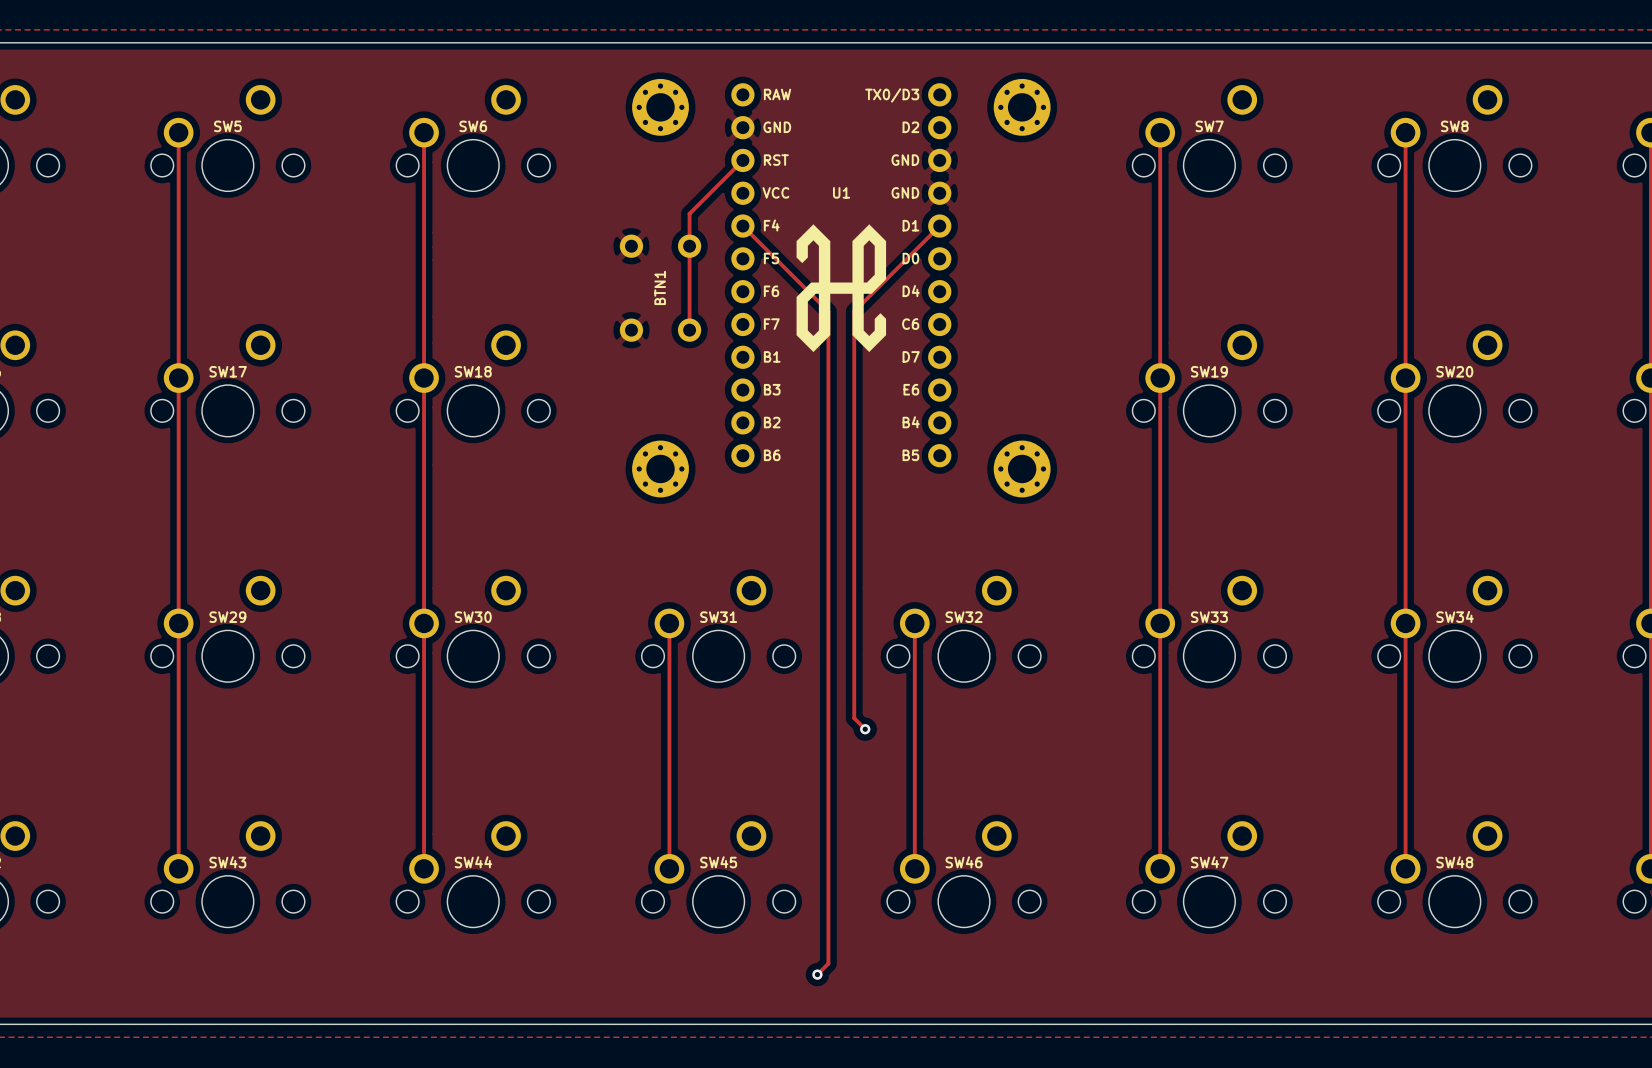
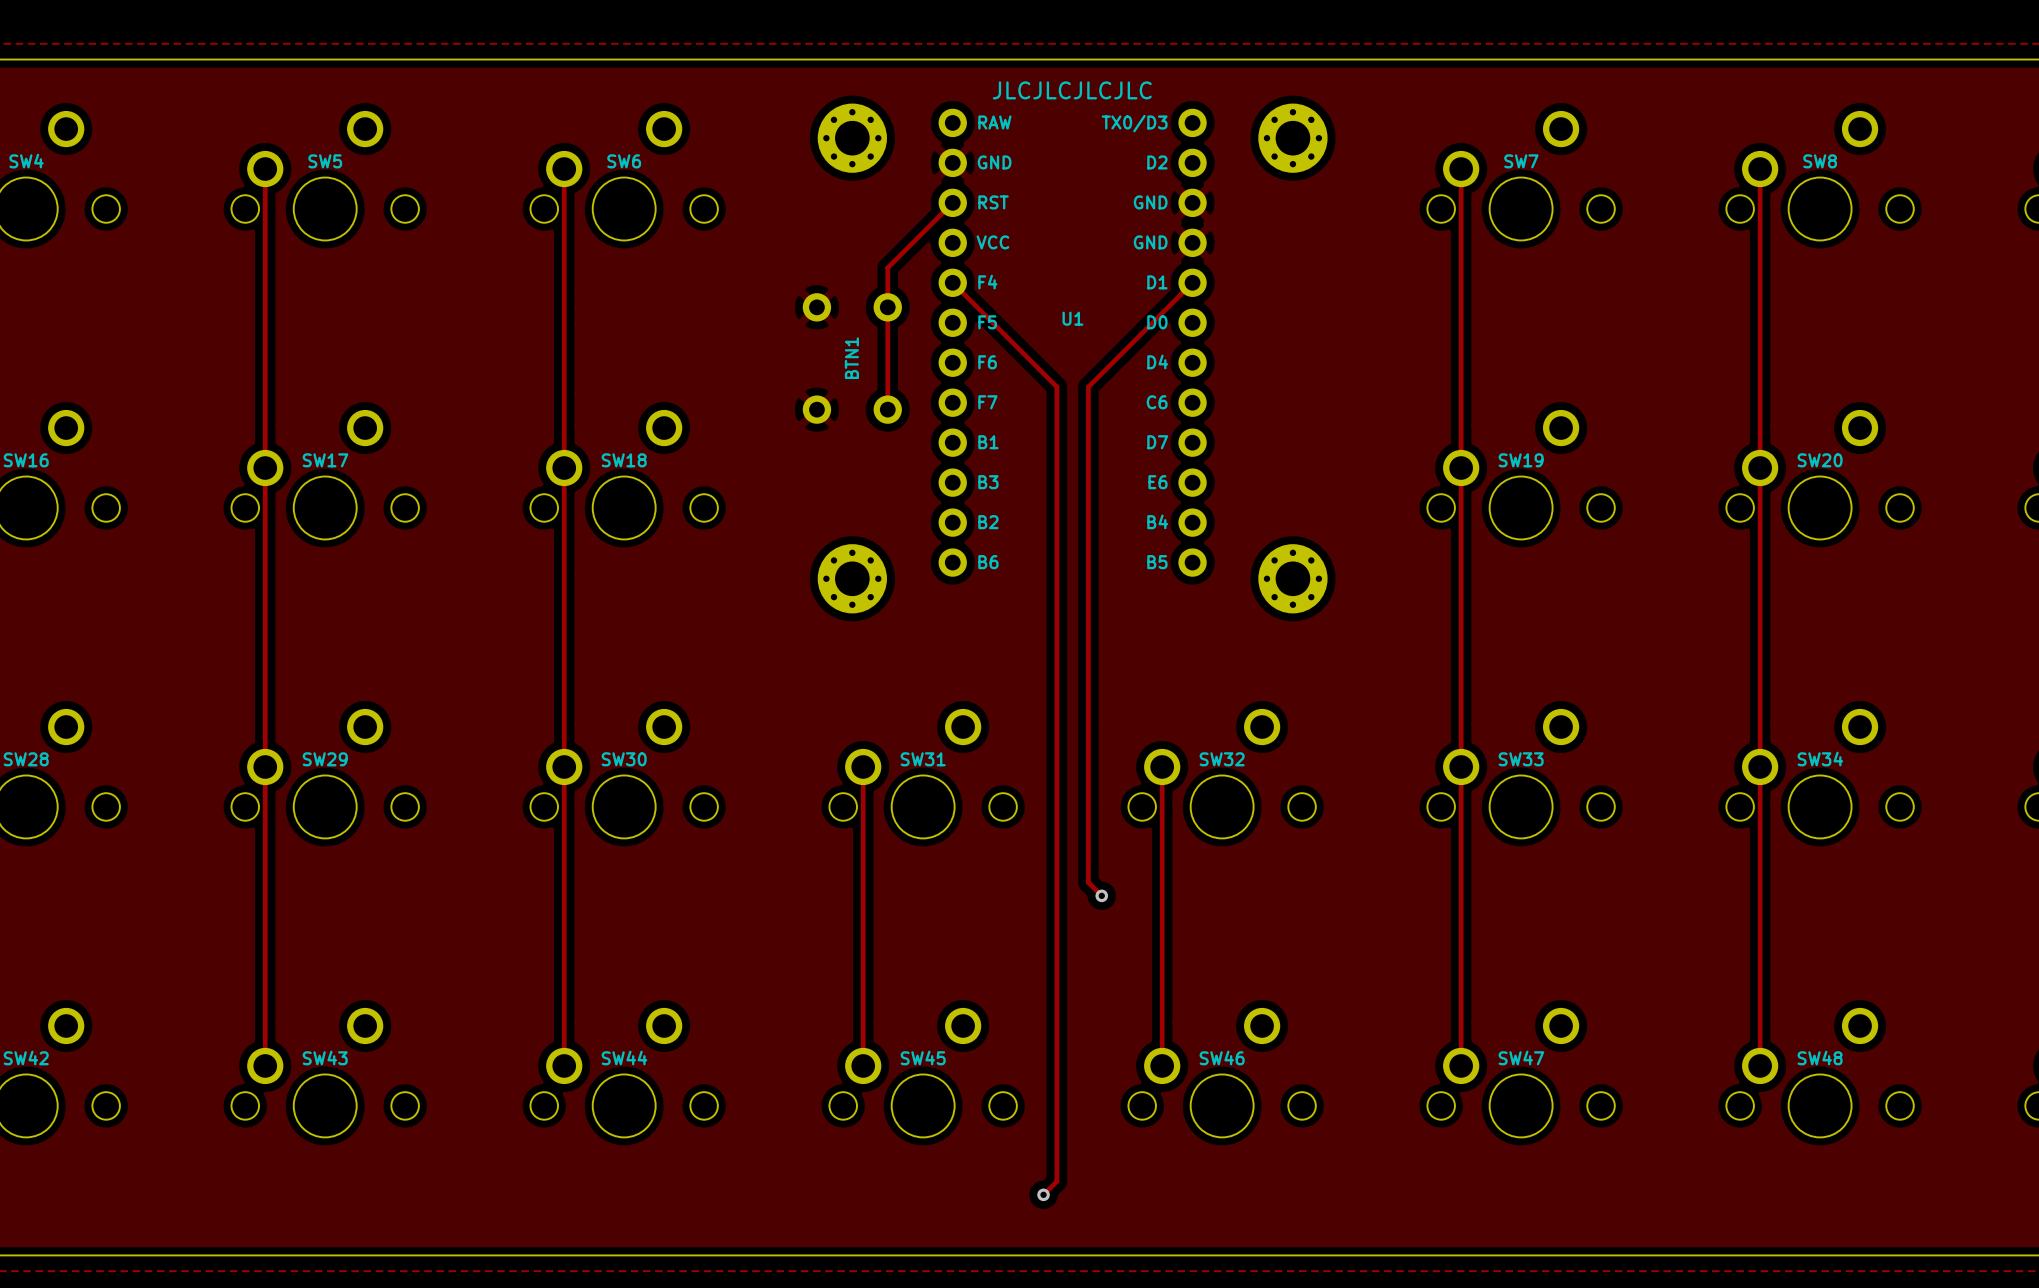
text: none -> JLCJLCJLCJLC (1072, 90)
U1 name position: U1 (841, 192) -> U1 (1072, 318)
drawing: [796, 224, 887, 353] -> none

